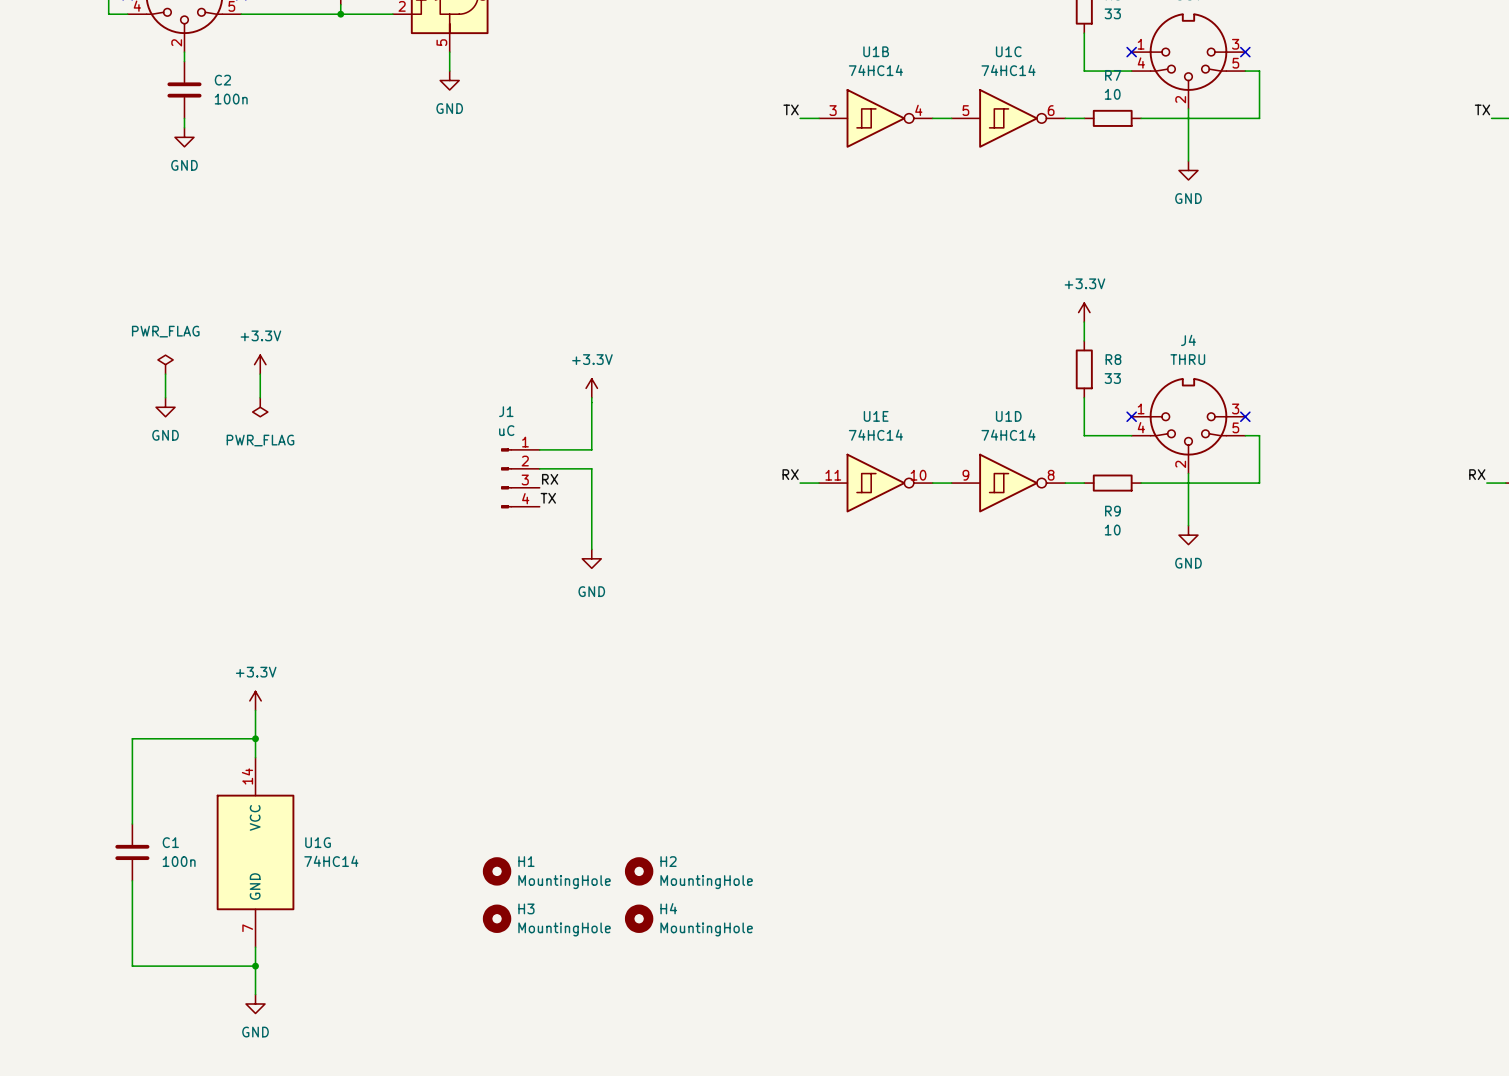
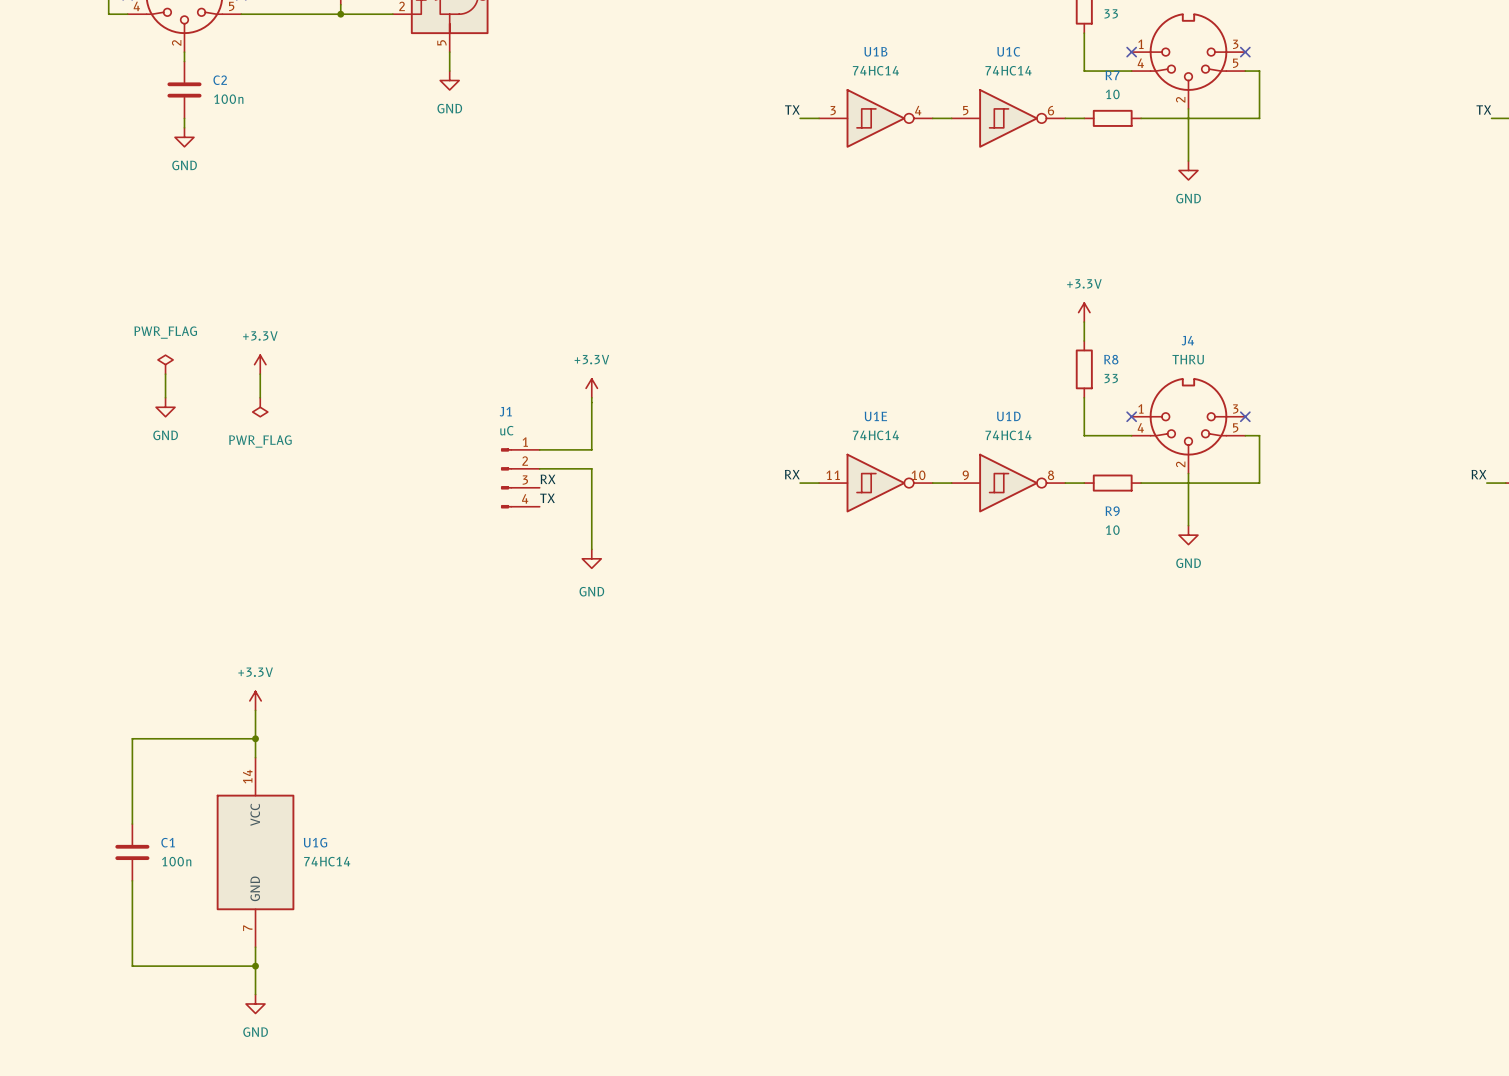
H1: MountingHole (497, 871) -> none
H2: MountingHole (639, 871) -> none
H3: MountingHole (497, 918) -> none
H4: MountingHole (639, 918) -> none

